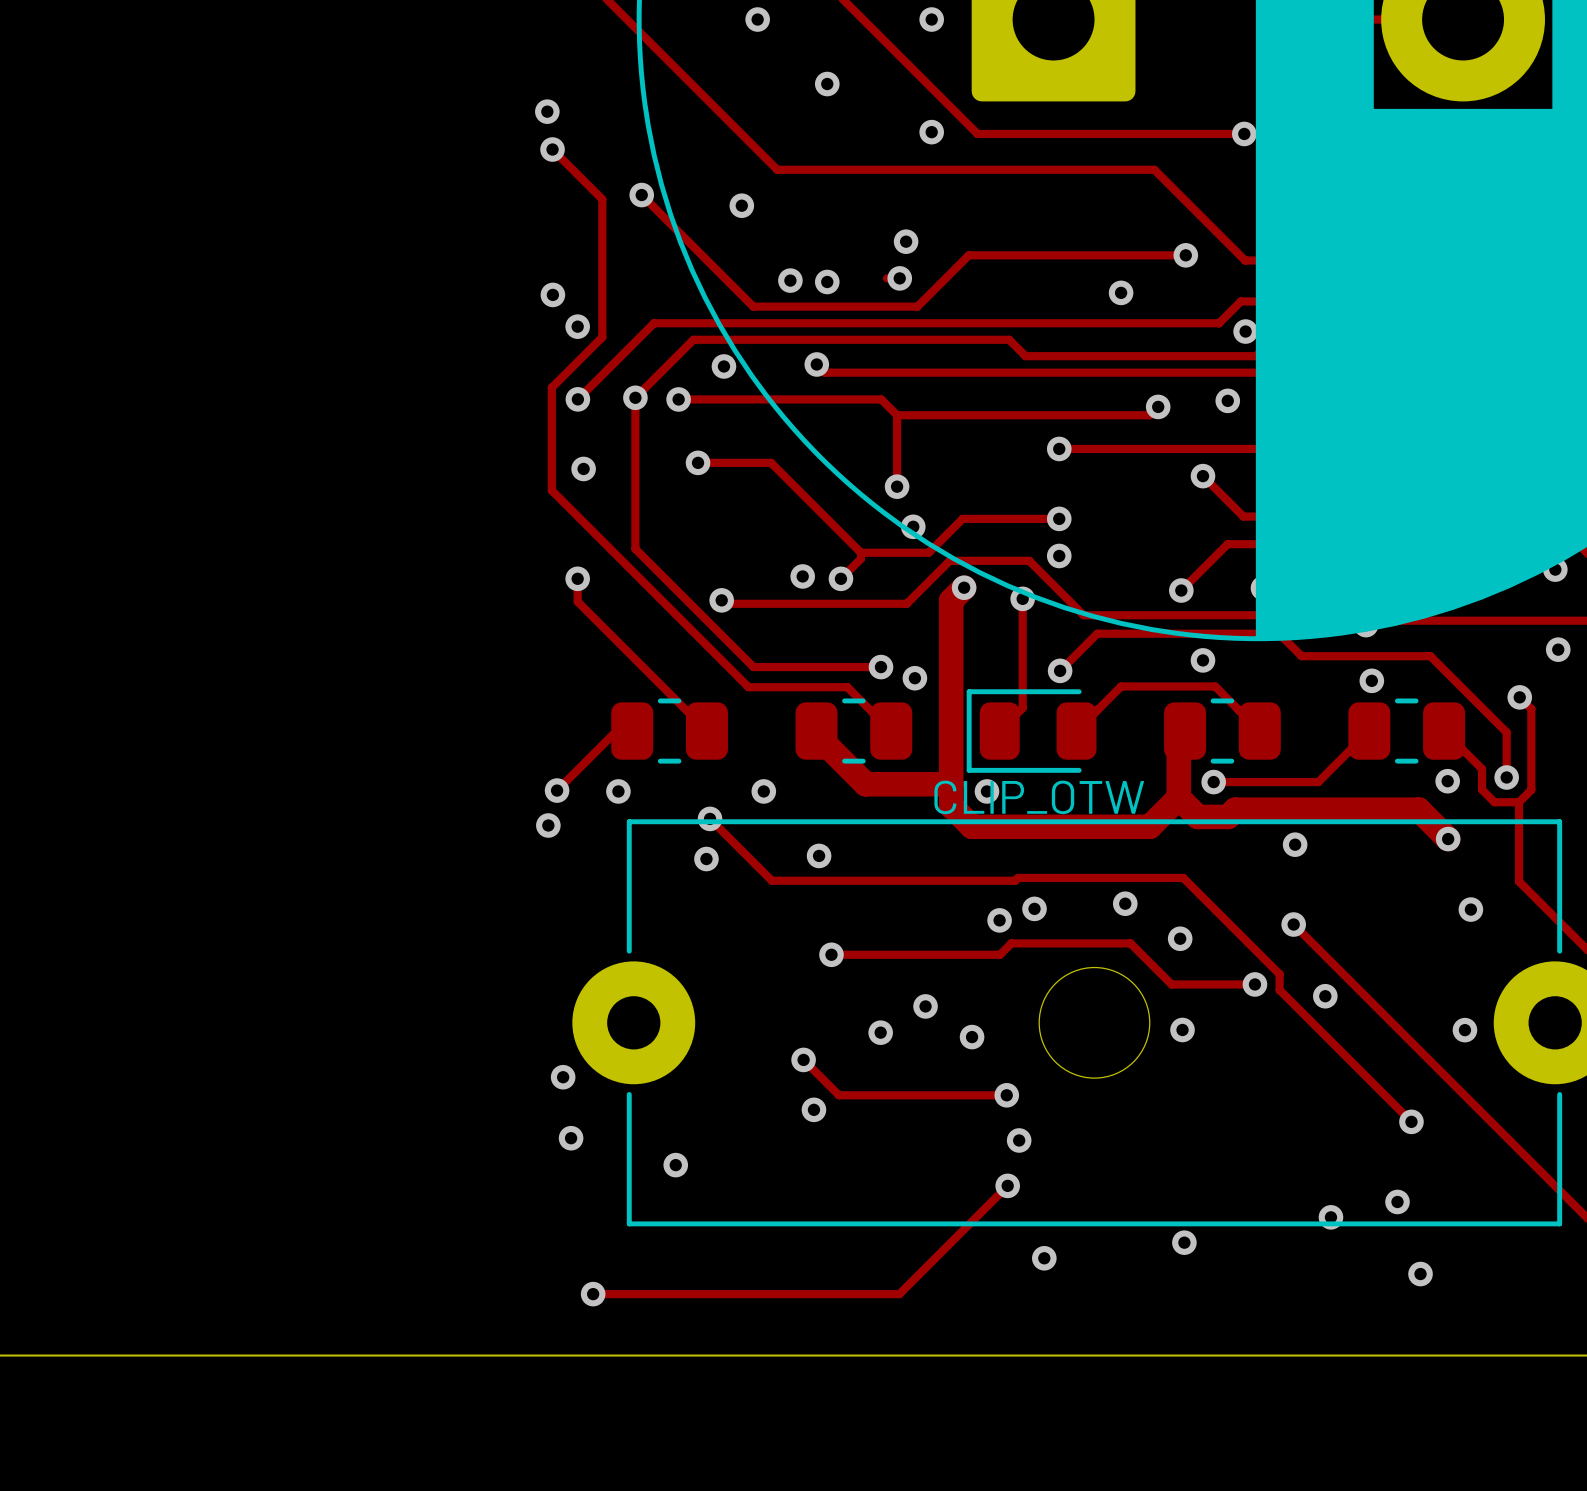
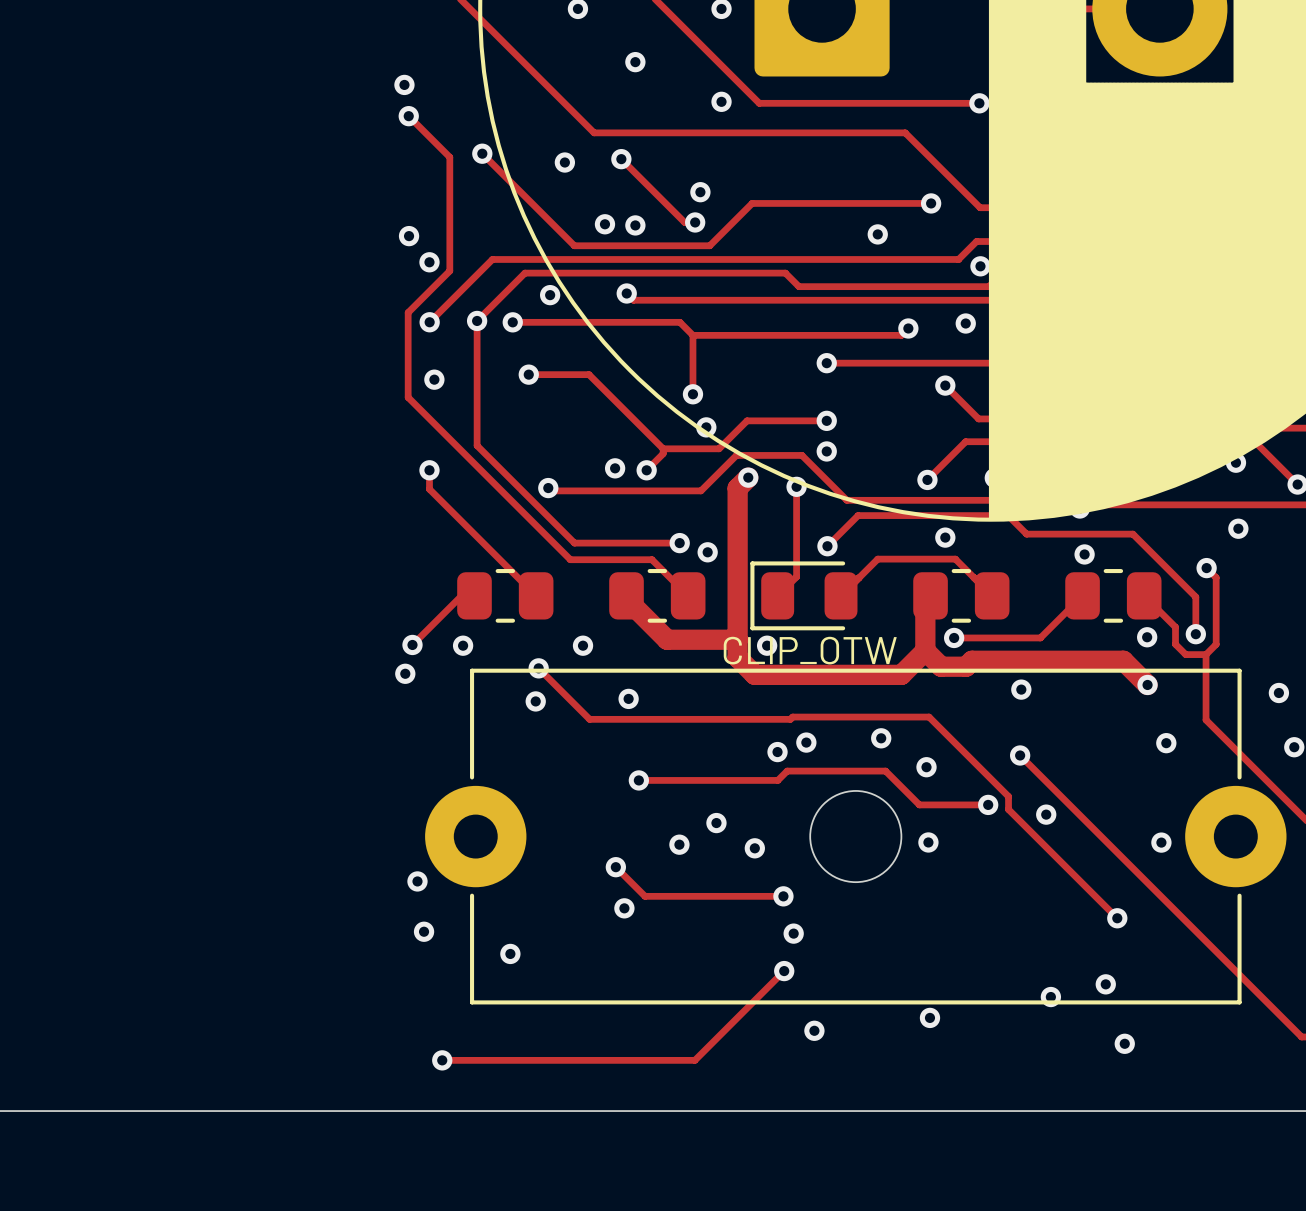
track: none -> (621, 159) (684, 222)
via: none -> (621, 159)

